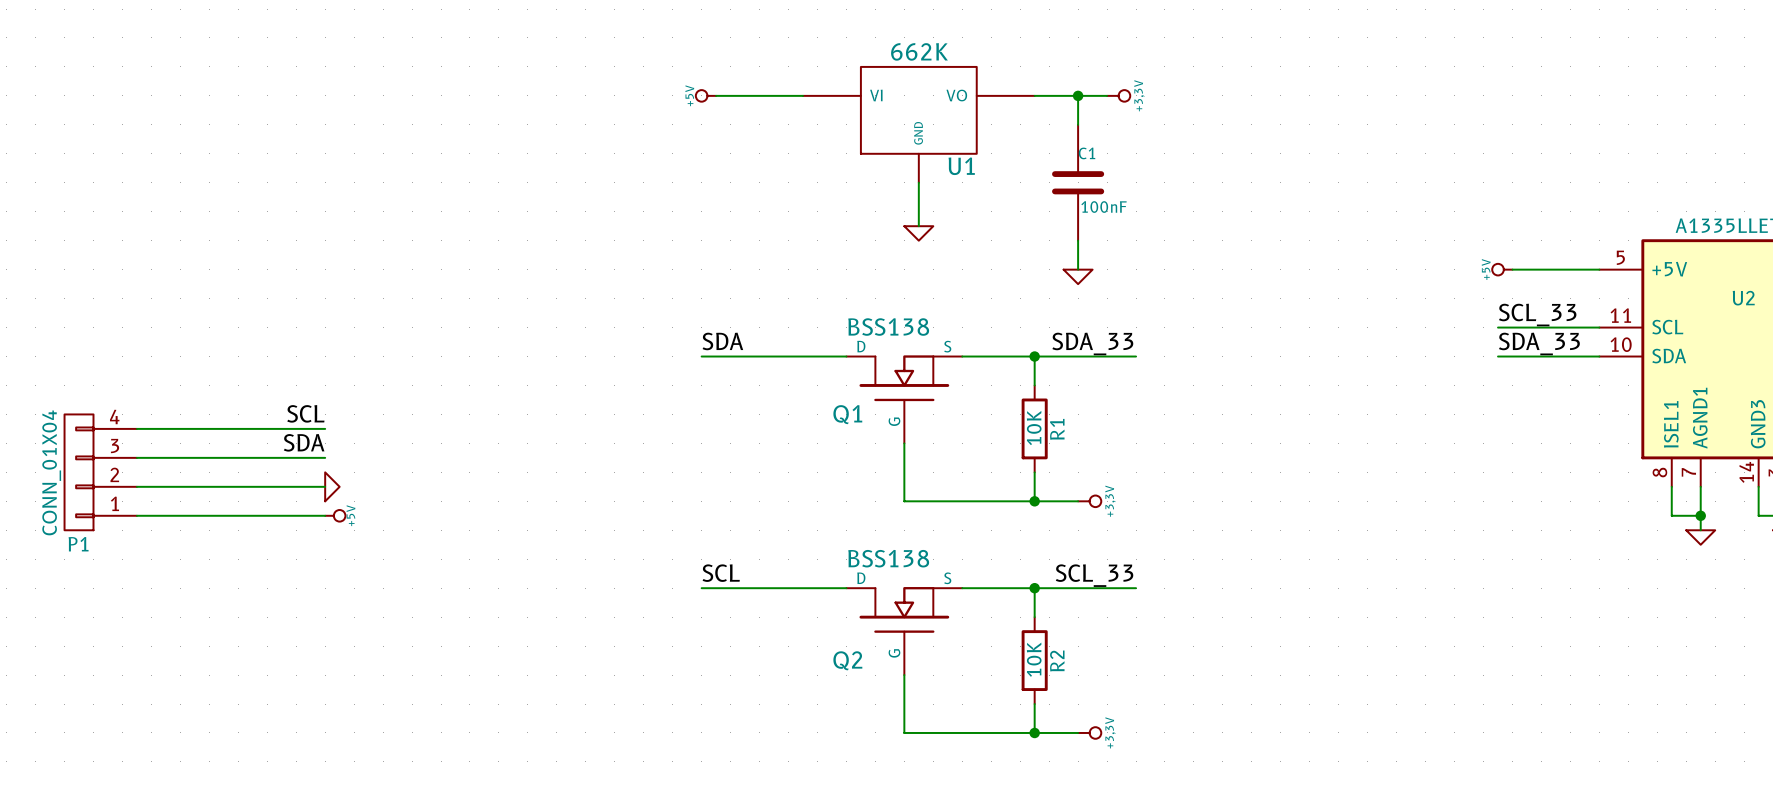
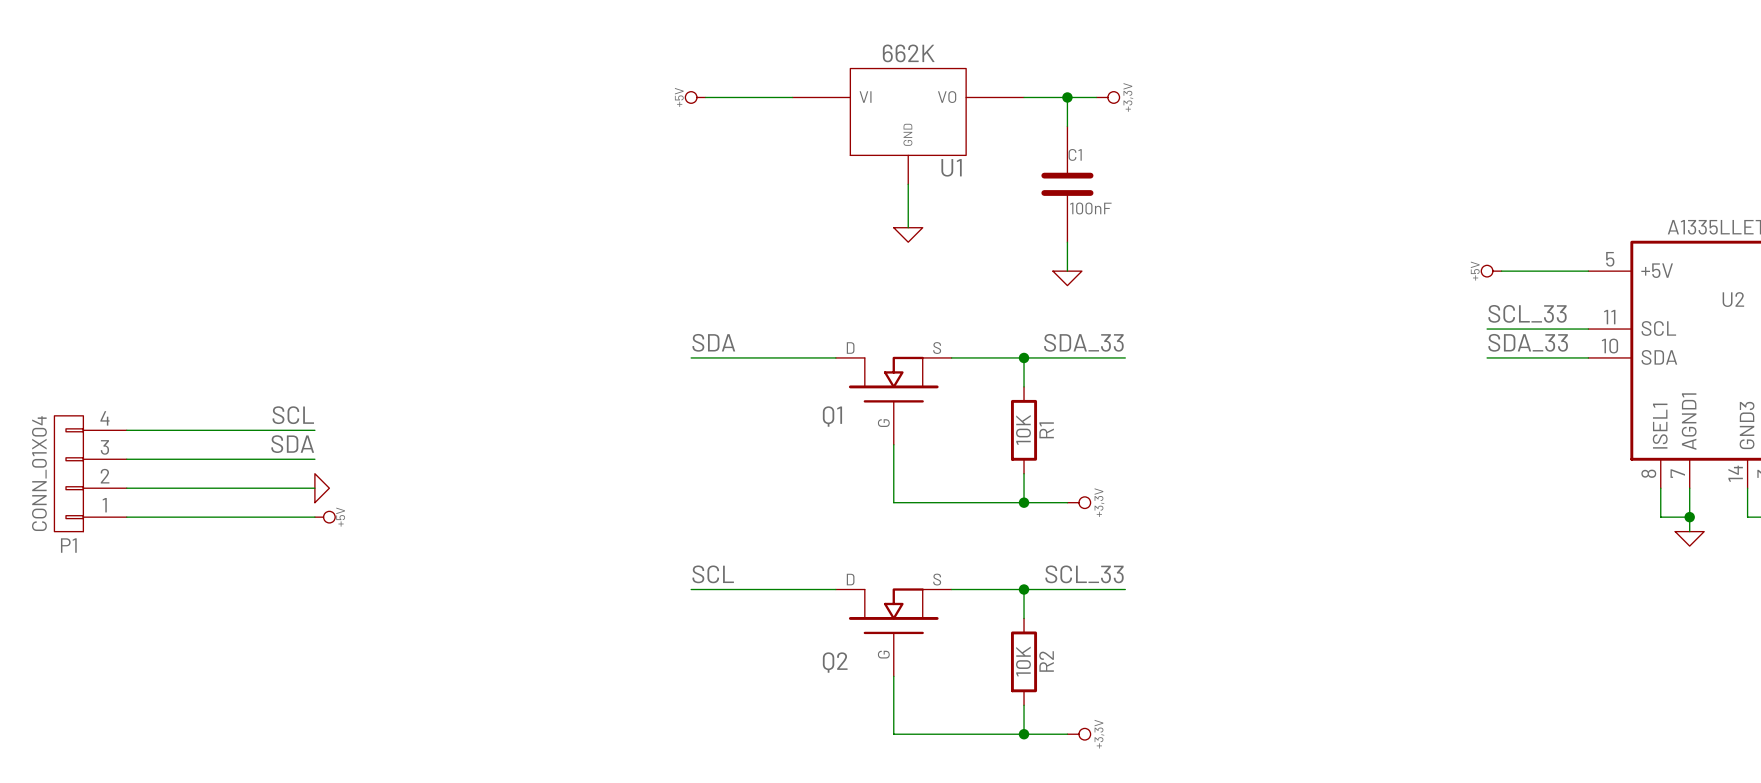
Q1 value: BSS138 (888, 327) -> none
Q2 value: BSS138 (888, 558) -> none

